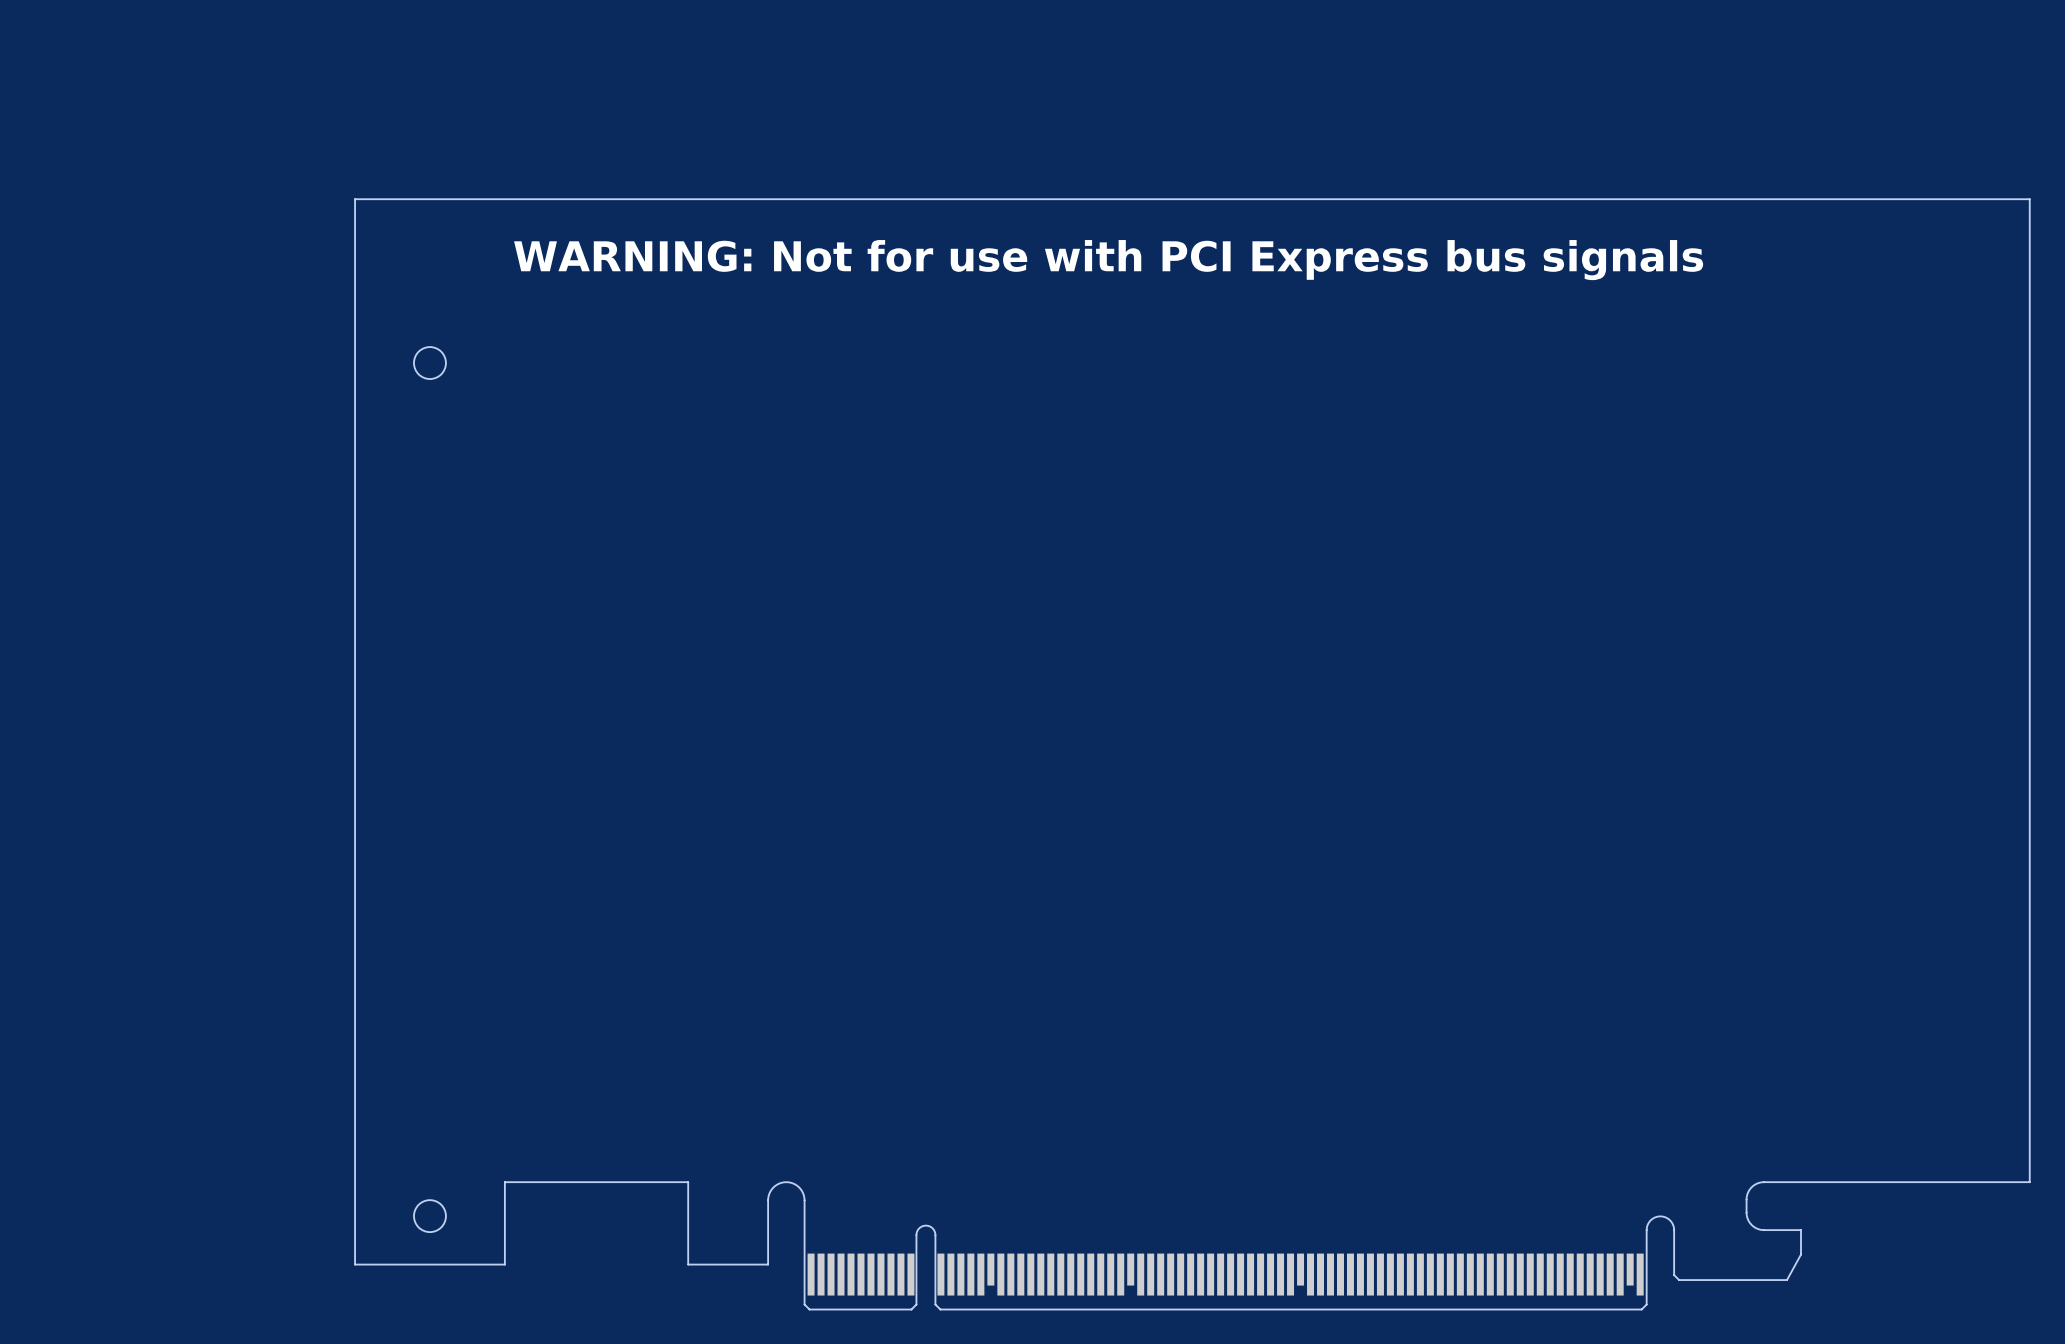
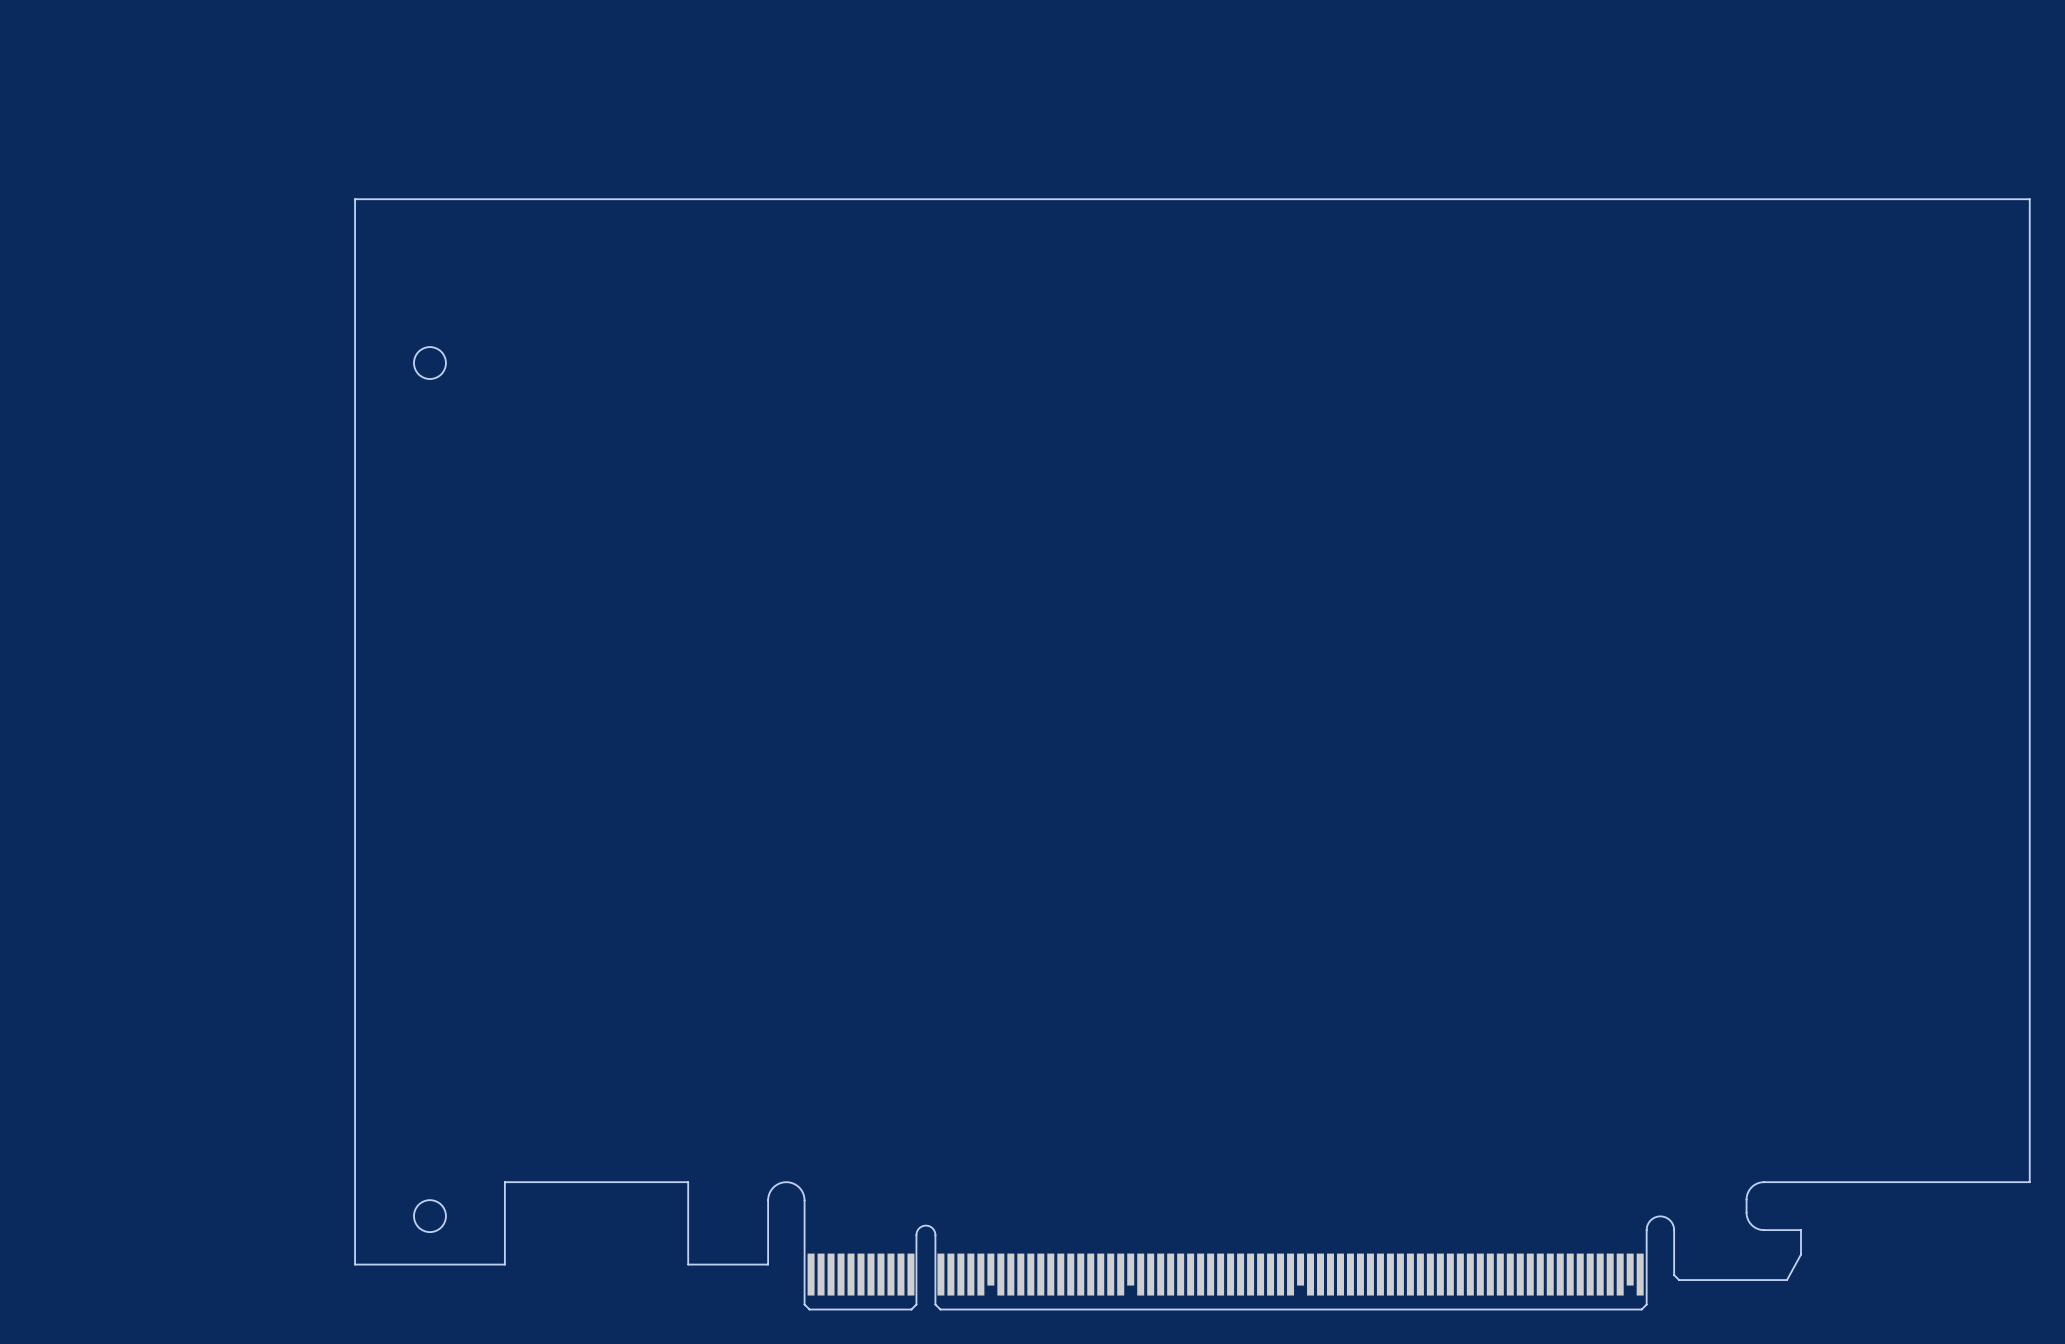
text: WARNING: Not for use with PCI Express bus signals (1108, 260) -> none

